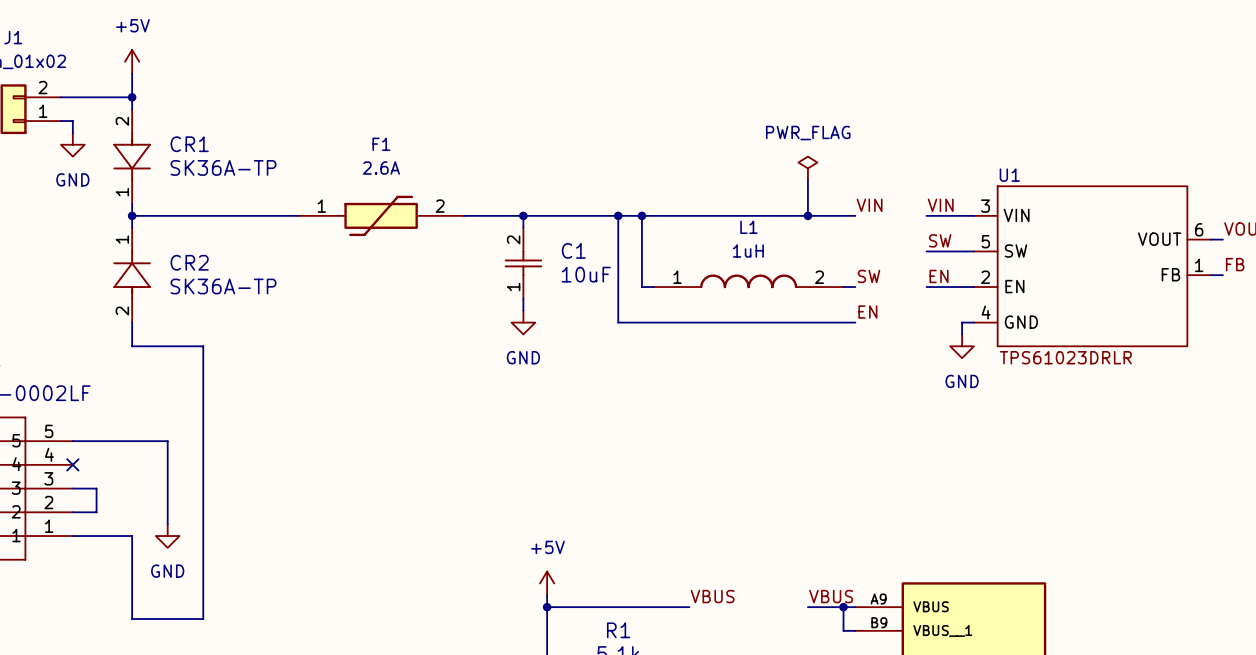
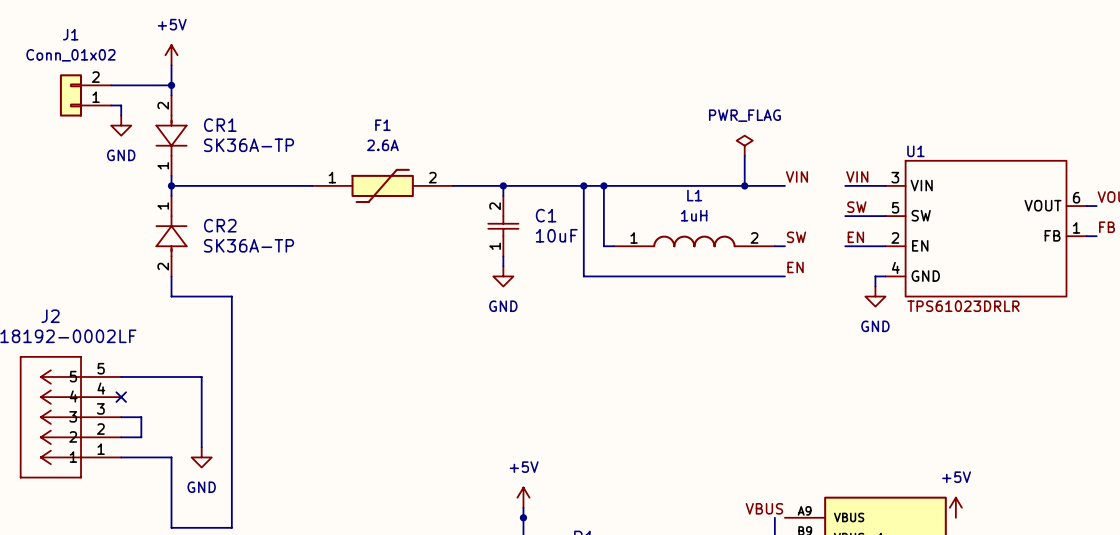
power symbol: none -> +5V (955, 507)
label: VBUS (712, 596) -> none
wire: (547, 607) (689, 607) -> none
wire: (807, 607) (855, 607) -> none
junction: (843, 607) -> none

